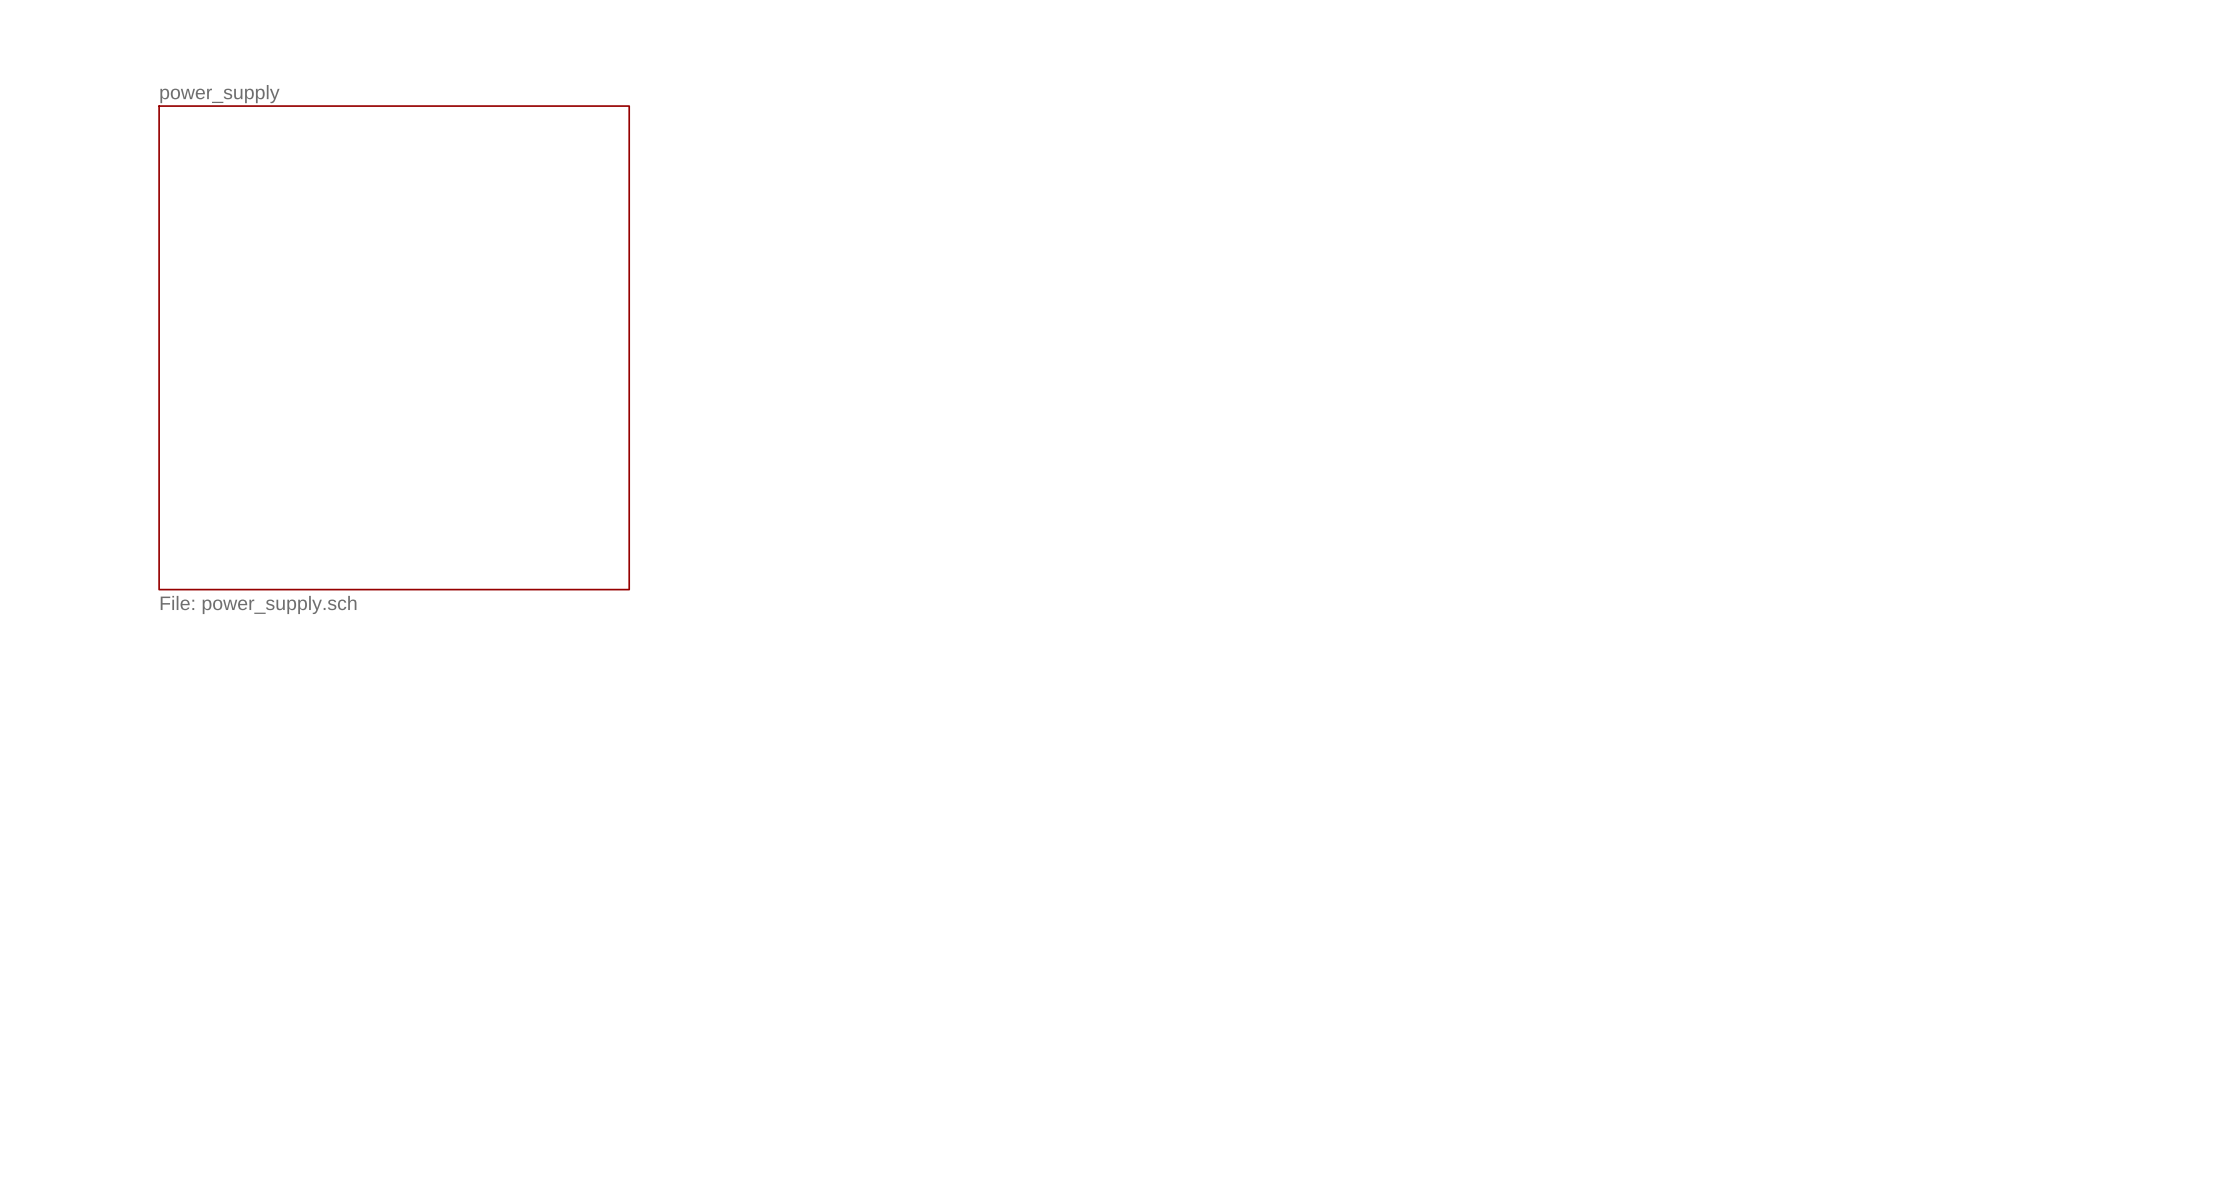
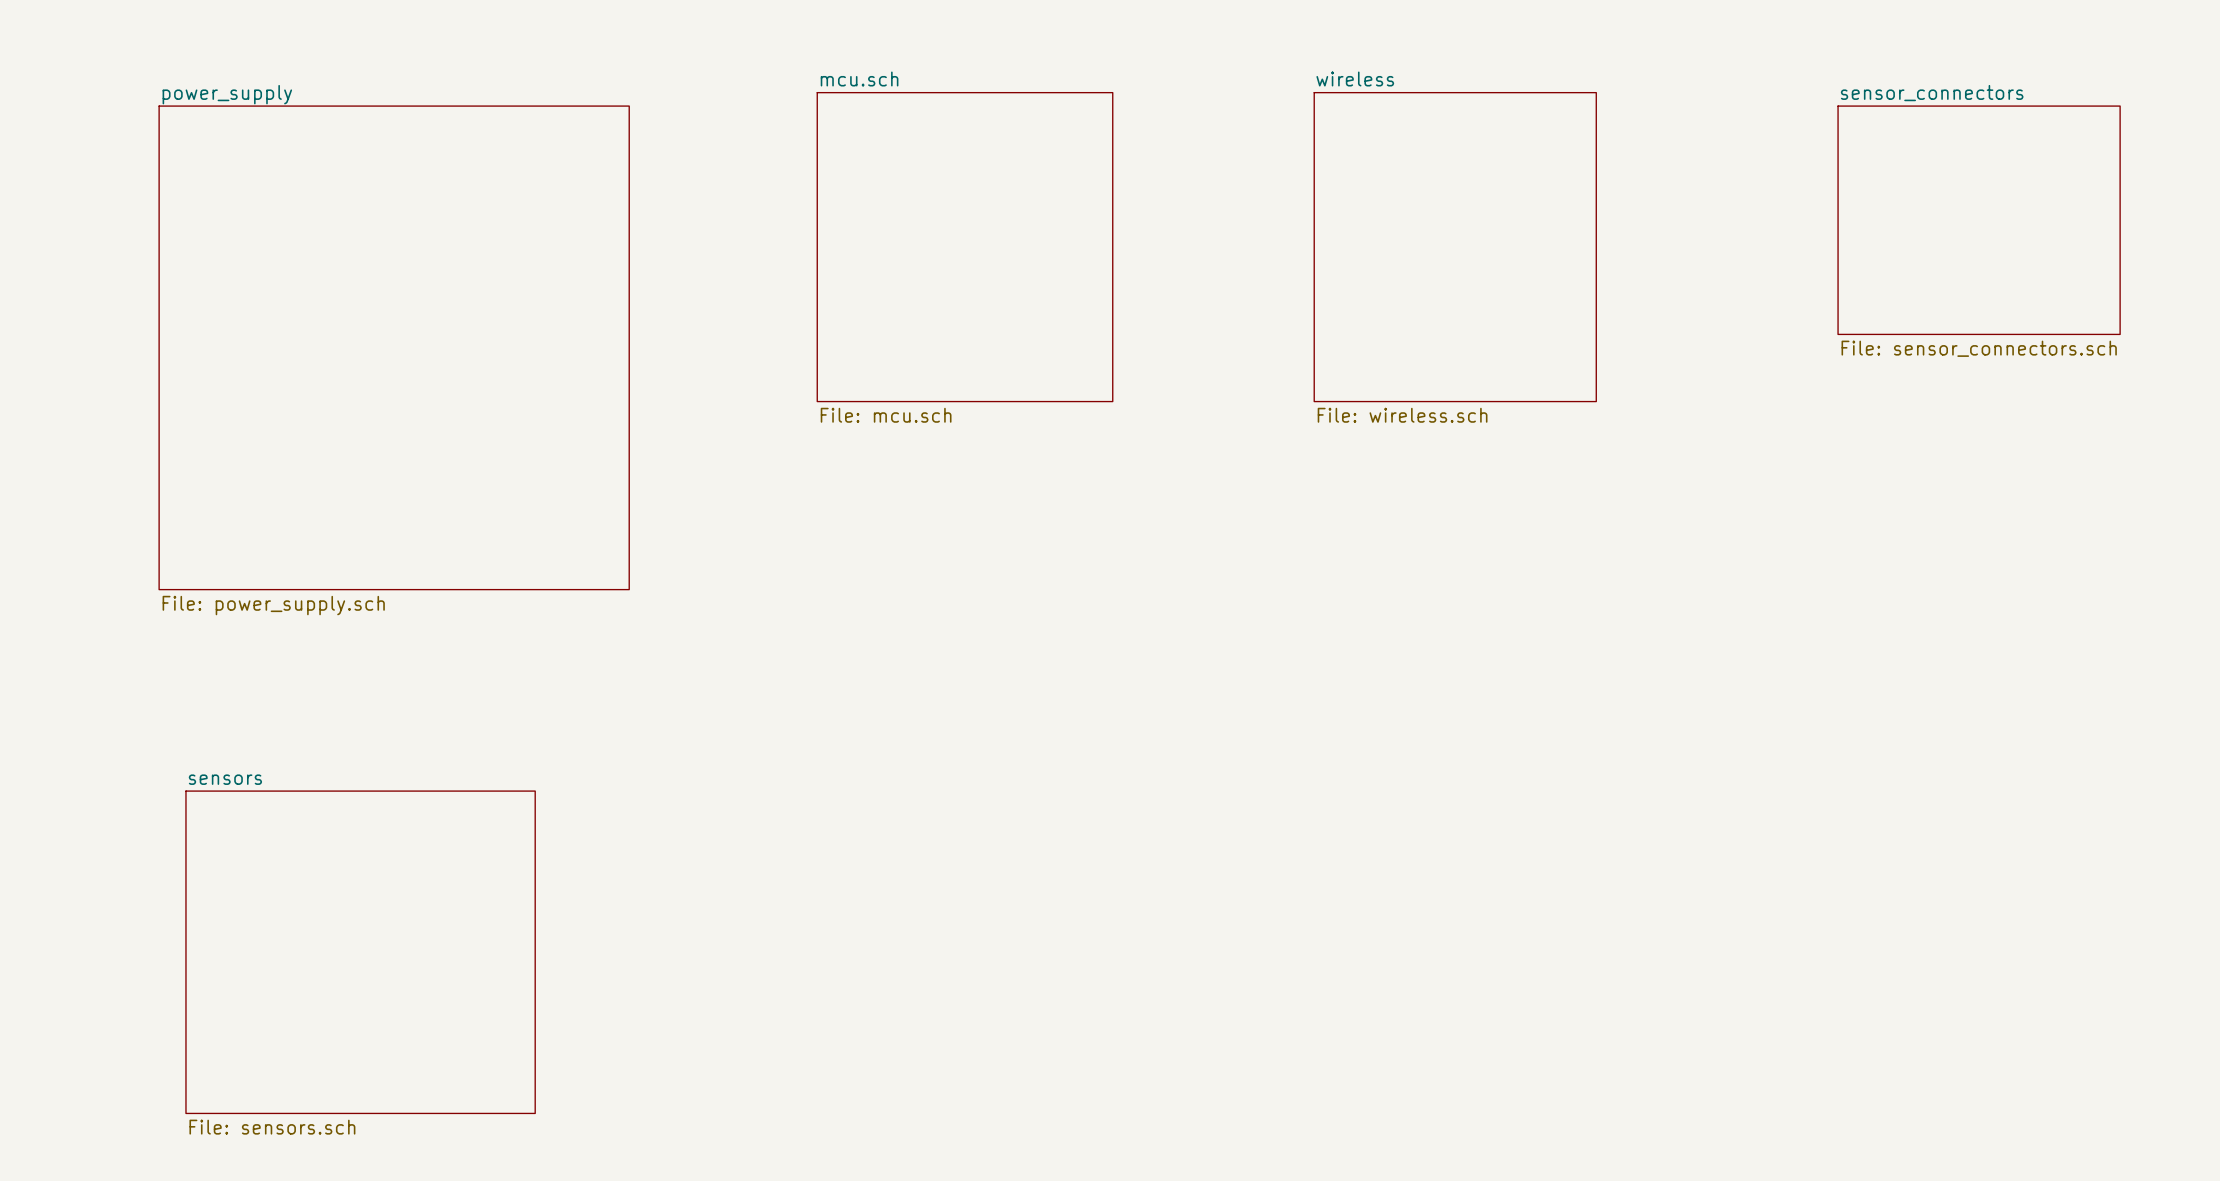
sheet sensor_connectors: none -> File: sensor_connectors.sch (1979, 220)
sheet mcu.sch: none -> File: mcu.sch (965, 247)
sheet wireless: none -> File: wireless.sch (1455, 247)
sheet sensors: none -> File: sensors.sch (360, 952)

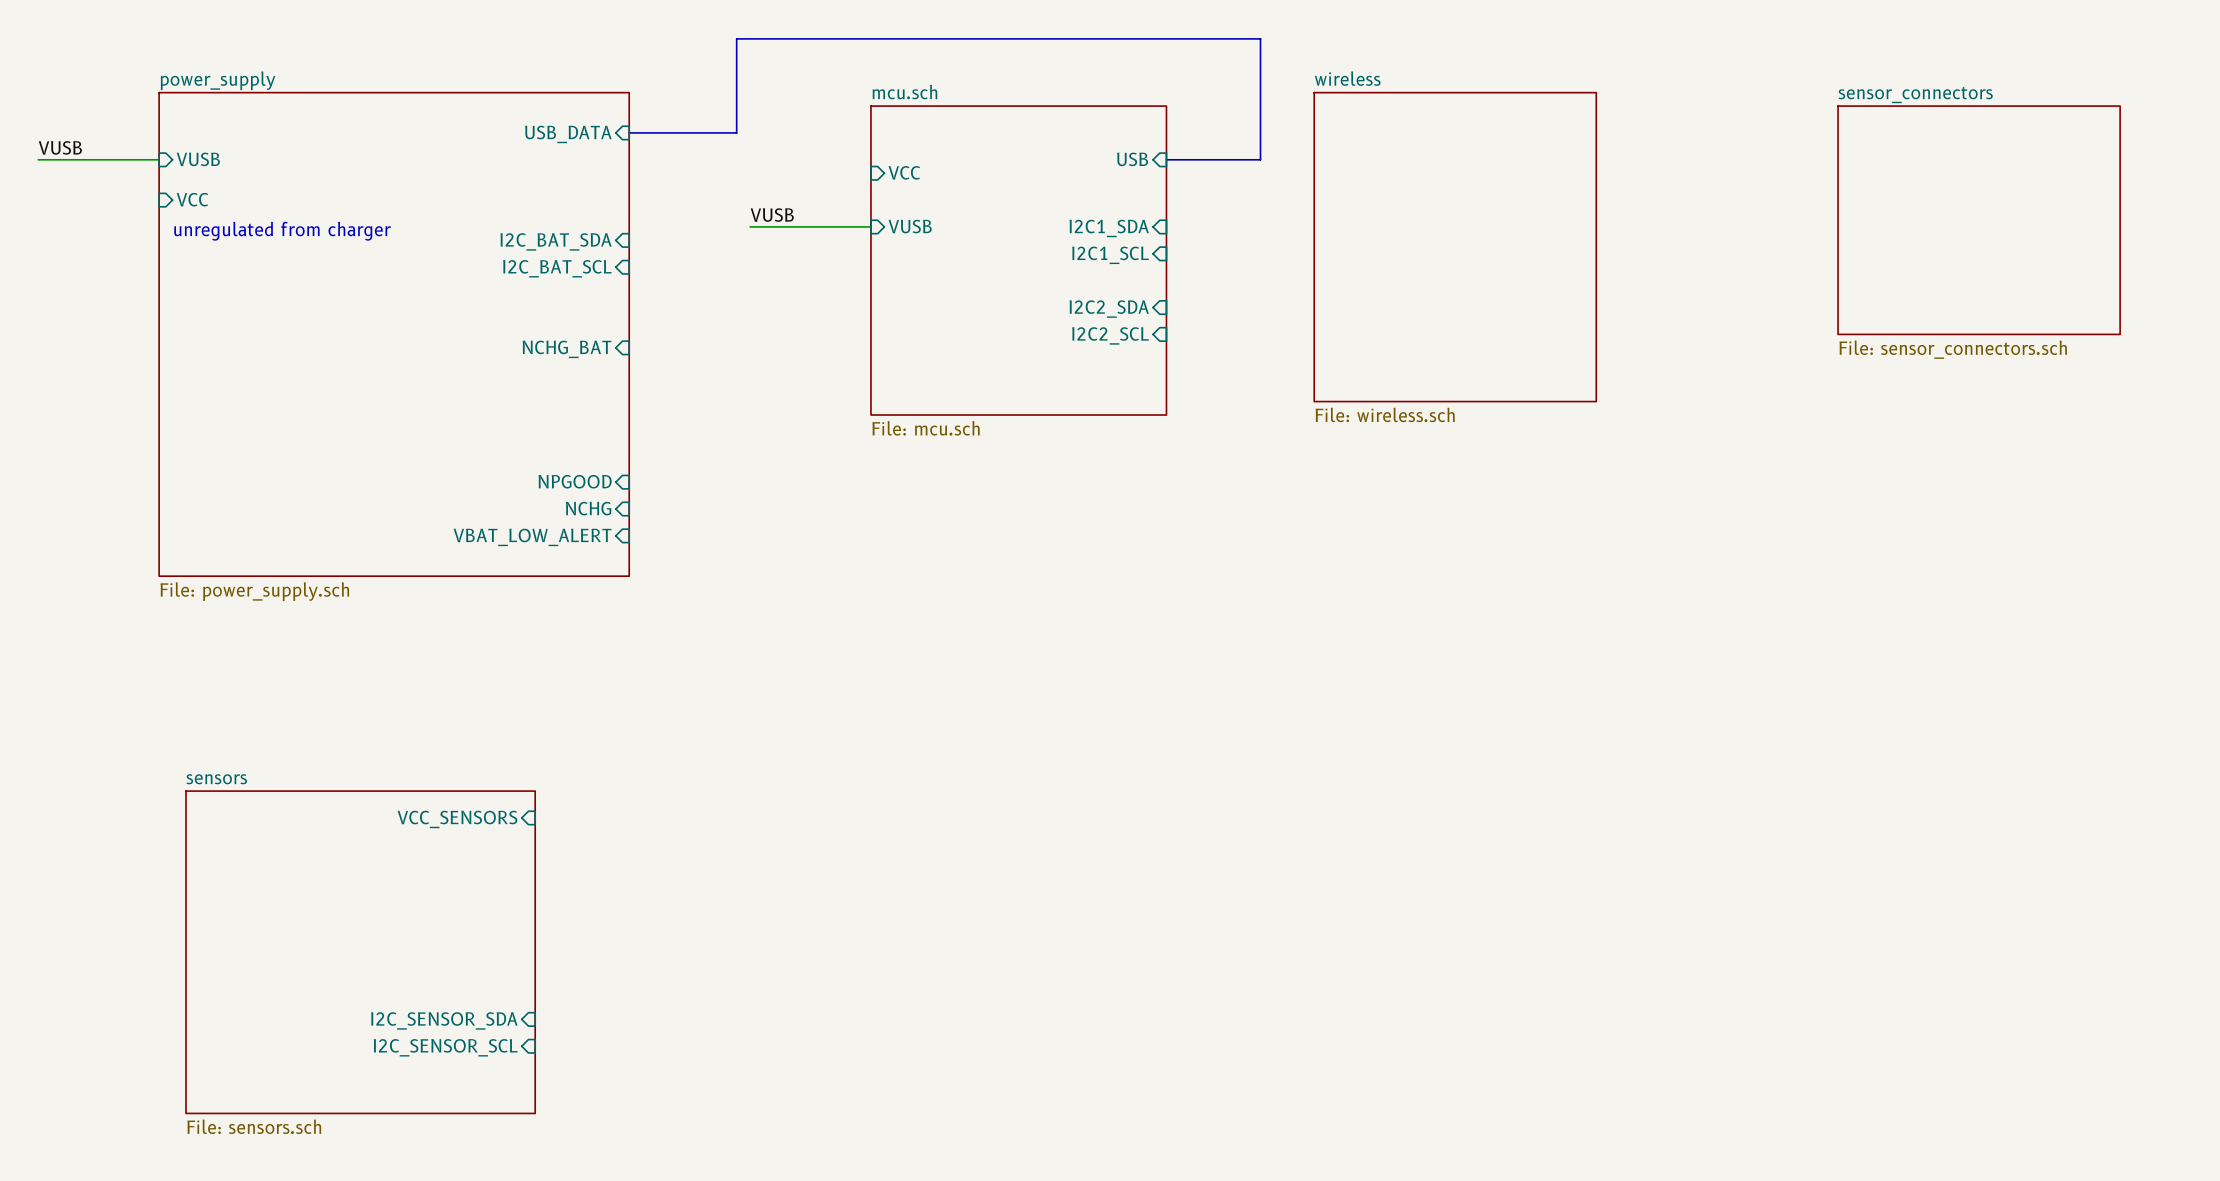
bus: none -> (629, 132) (736, 132) (736, 38) (1260, 38) (1260, 159) (1166, 159)
sheet pin: none -> USB_DATA (568, 134)
label: none -> VUSB (60, 147)
wire: none -> (38, 159) (159, 159)
sheet pin: none -> VUSB (198, 159)
sheet pin: none -> USB (1132, 159)
sheet pin: none -> VCC (904, 172)
sheet pin: none -> VCC (192, 199)
label: none -> VUSB (772, 215)
wire: none -> (750, 226) (870, 226)
sheet pin: none -> VUSB (910, 226)
sheet pin: none -> I2C1_SDA (1109, 228)
text: none -> unregulated from charger (282, 231)
sheet pin: none -> I2C_BAT_SDA (556, 241)
sheet mcu.sch position: (965, 247) -> (1018, 260)
sheet pin: none -> I2C1_SCL (1110, 255)
sheet pin: none -> I2C_BAT_SCL (557, 268)
sheet pin: none -> I2C2_SDA (1109, 309)
sheet pin: none -> I2C2_SCL (1110, 335)
sheet power_supply position: (394, 347) -> (394, 334)
sheet pin: none -> NCHG_BAT (567, 349)
sheet pin: none -> NPGOOD (575, 481)
sheet pin: none -> NCHG (588, 508)
sheet pin: none -> VBAT_LOW_ALERT (532, 537)
sheet pin: none -> VCC_SENSORS (457, 819)
sheet pin: none -> I2C_SENSOR_SDA (444, 1020)
sheet pin: none -> I2C_SENSOR_SCL (445, 1047)

